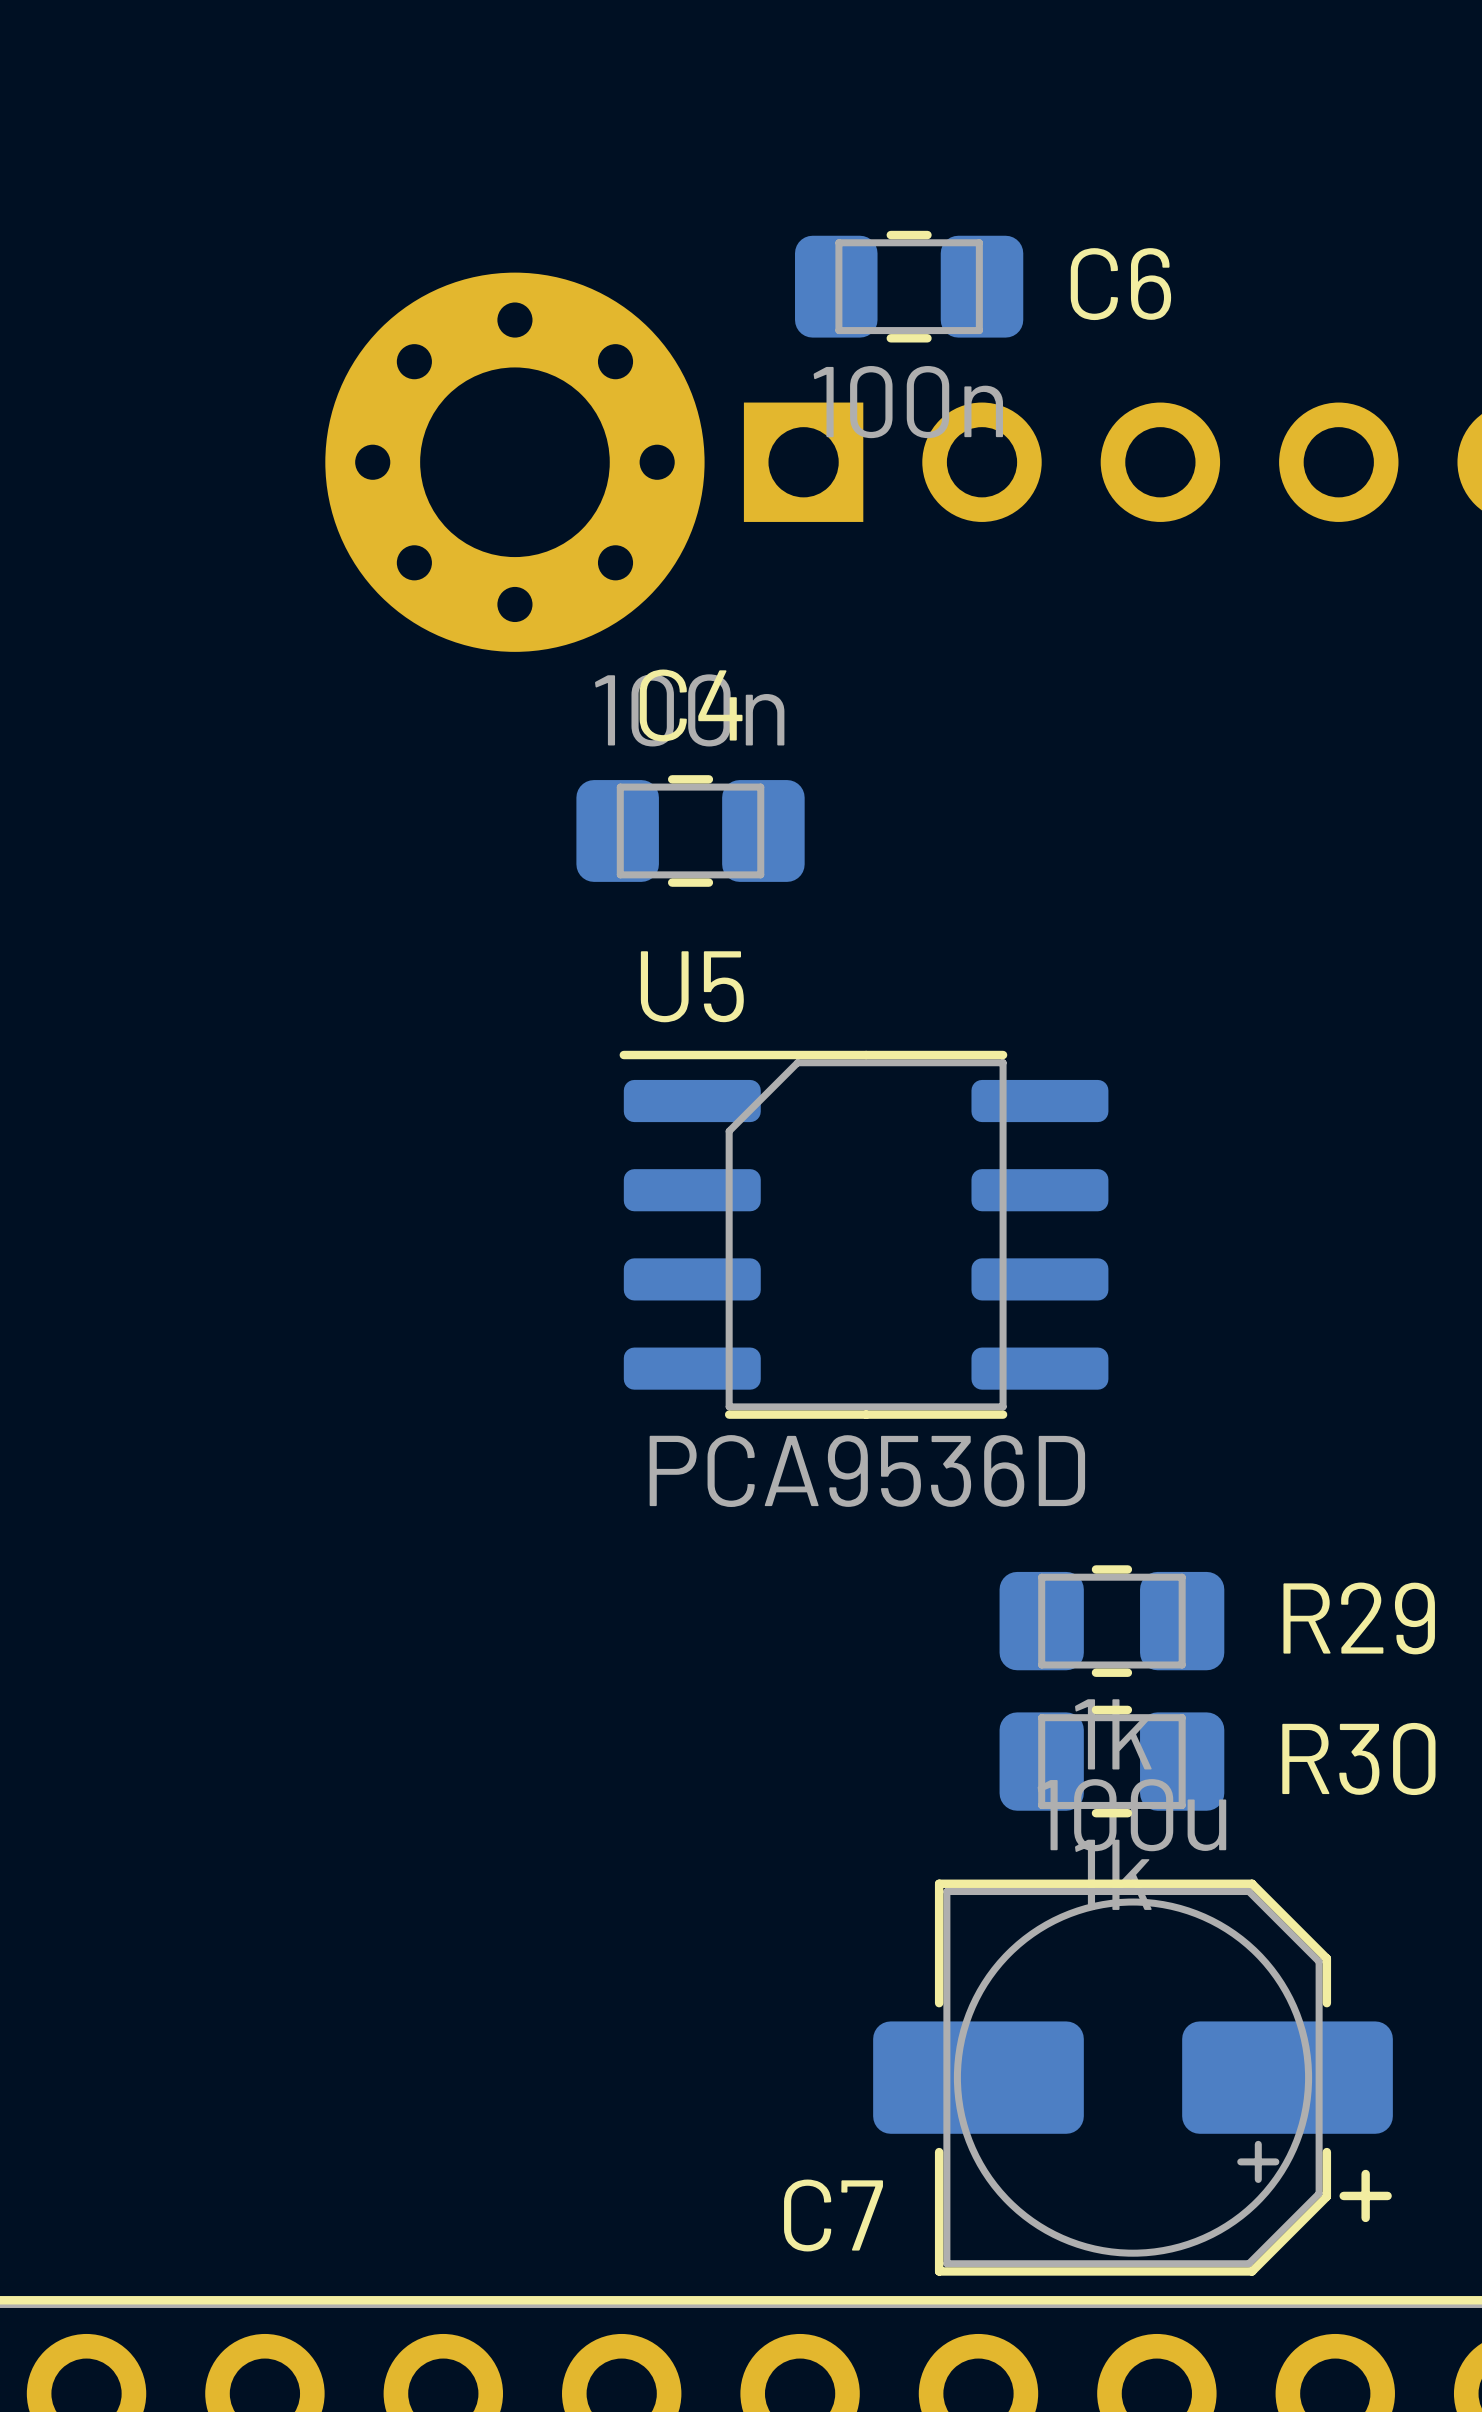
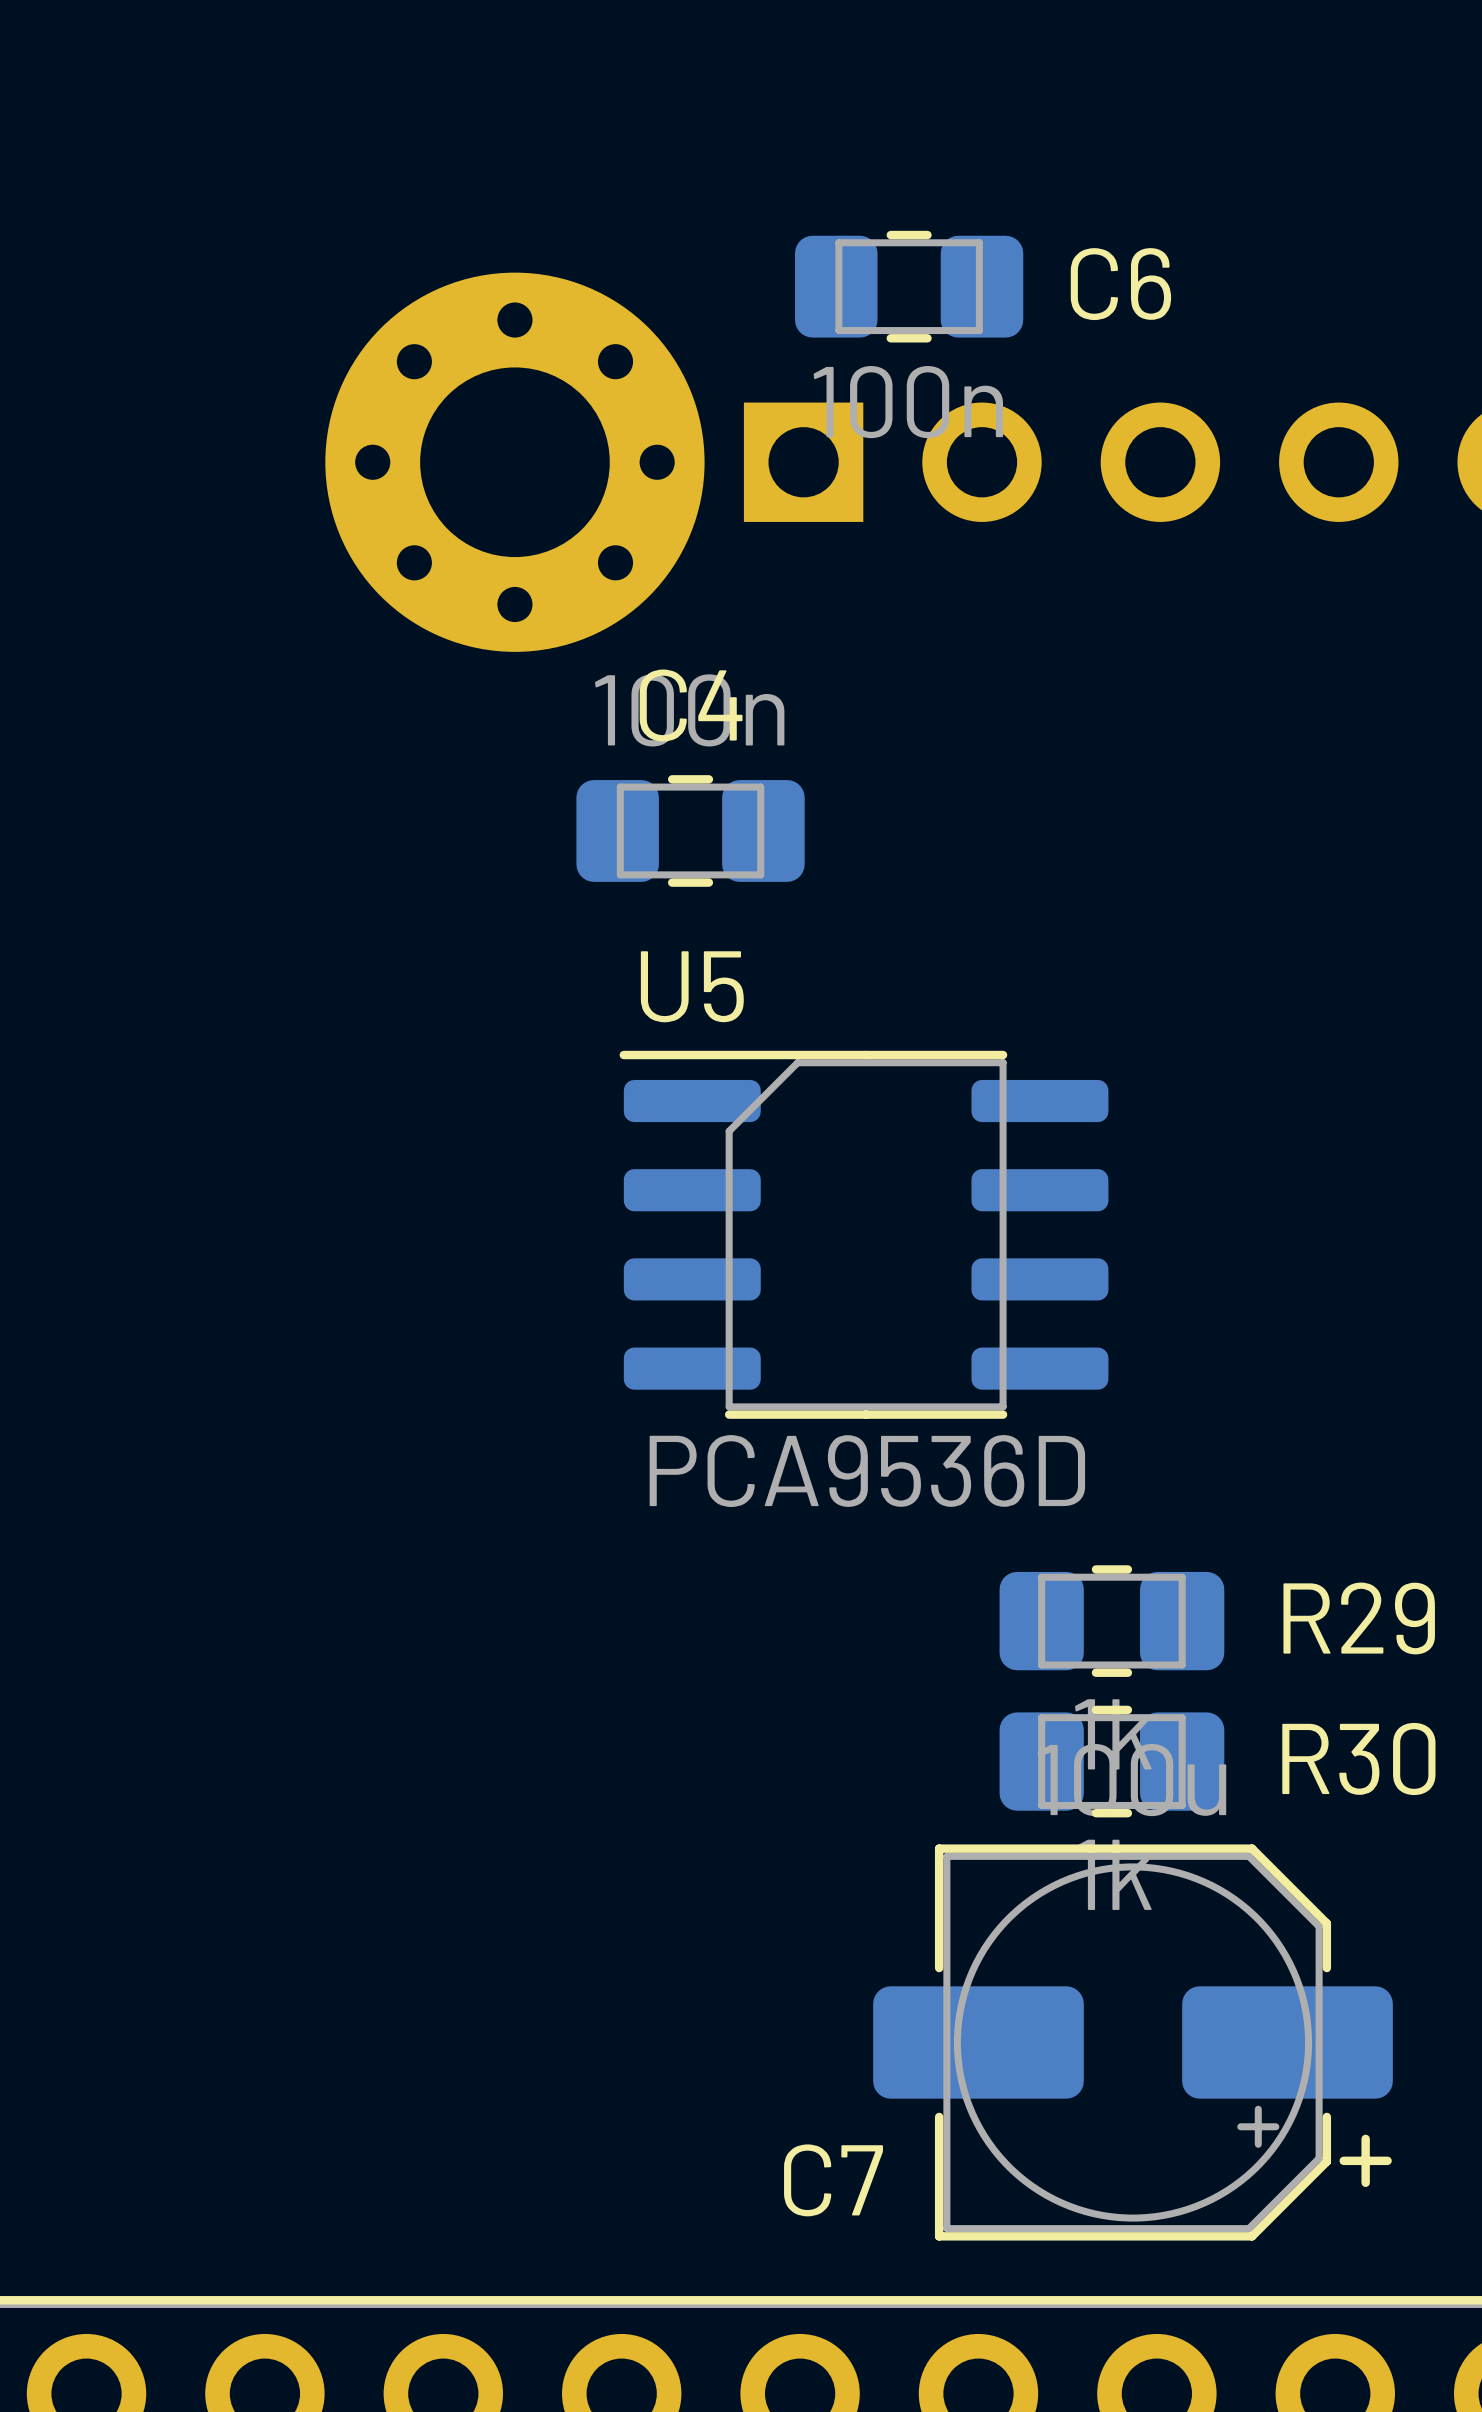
C7 position: (1133, 2077) -> (1133, 2042)

